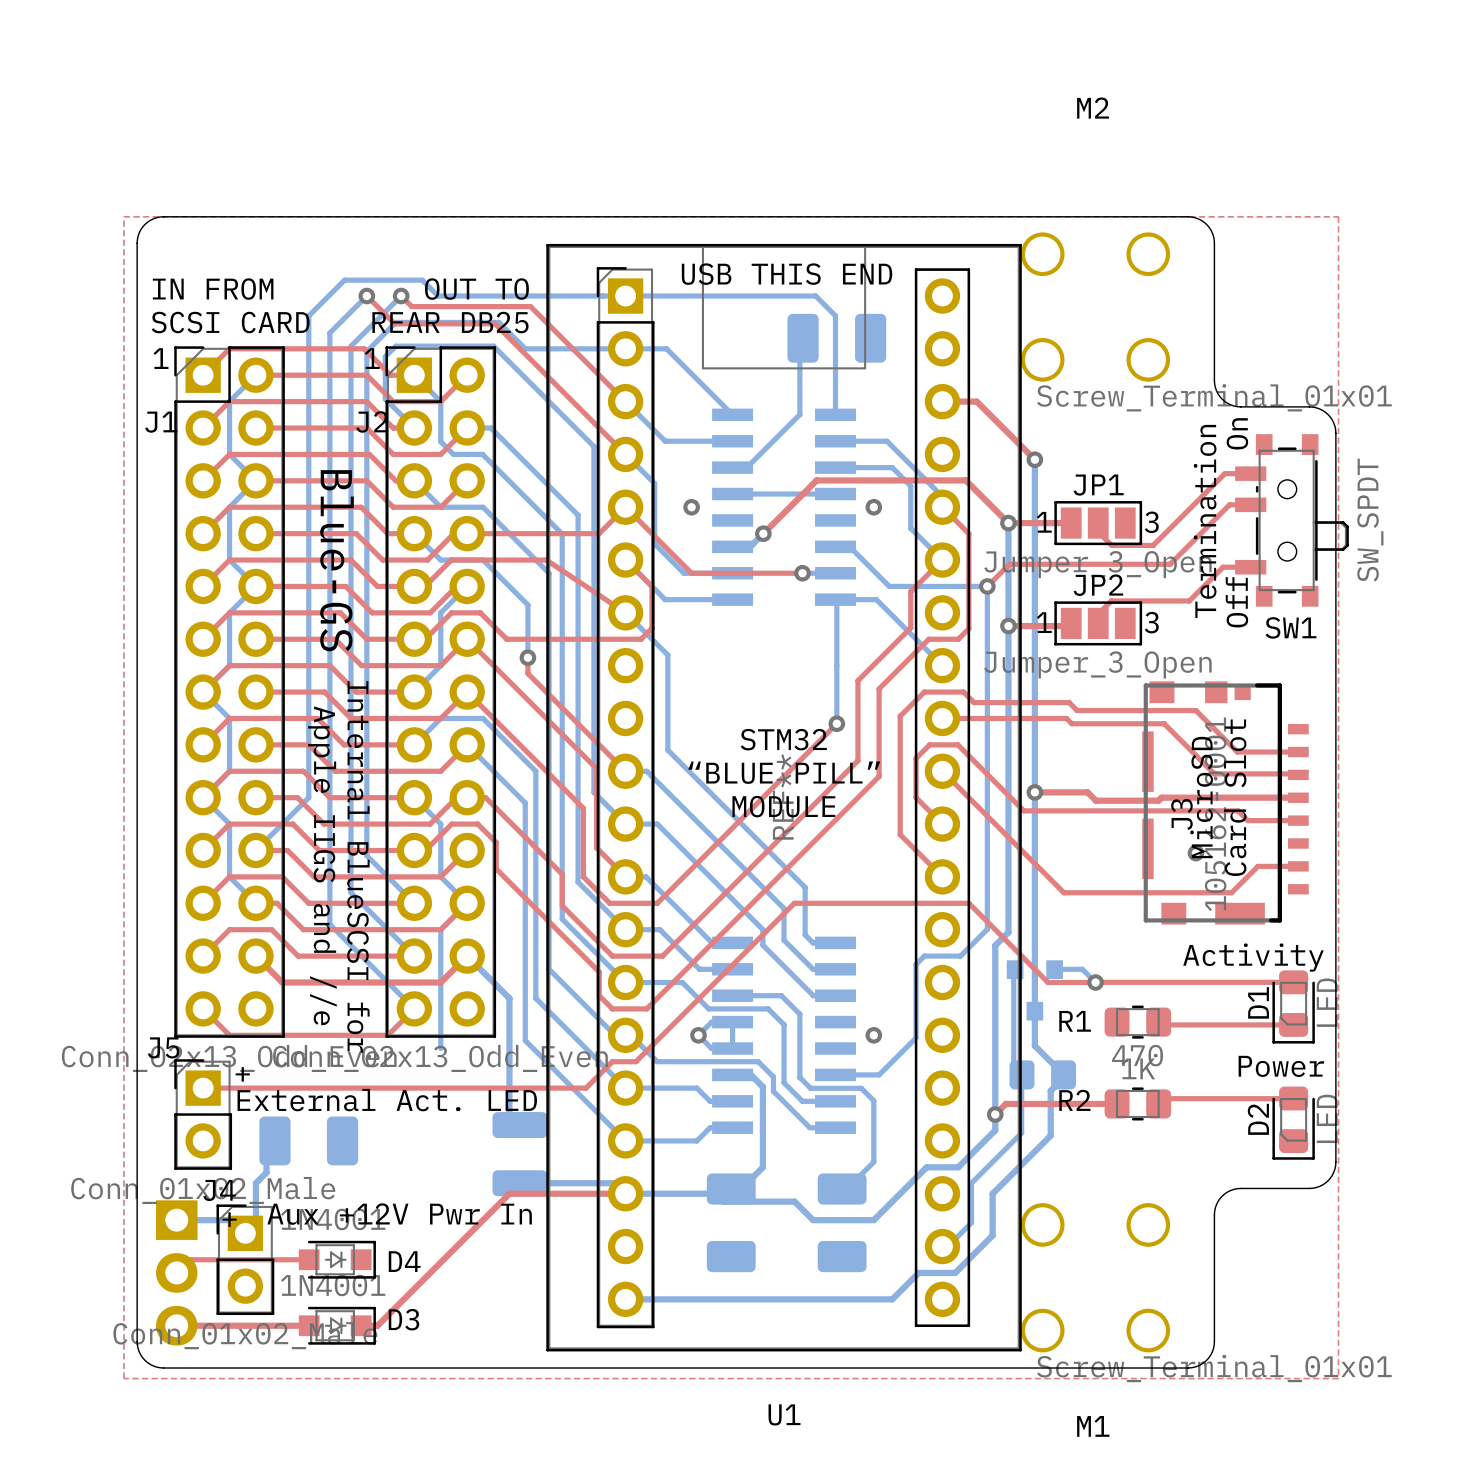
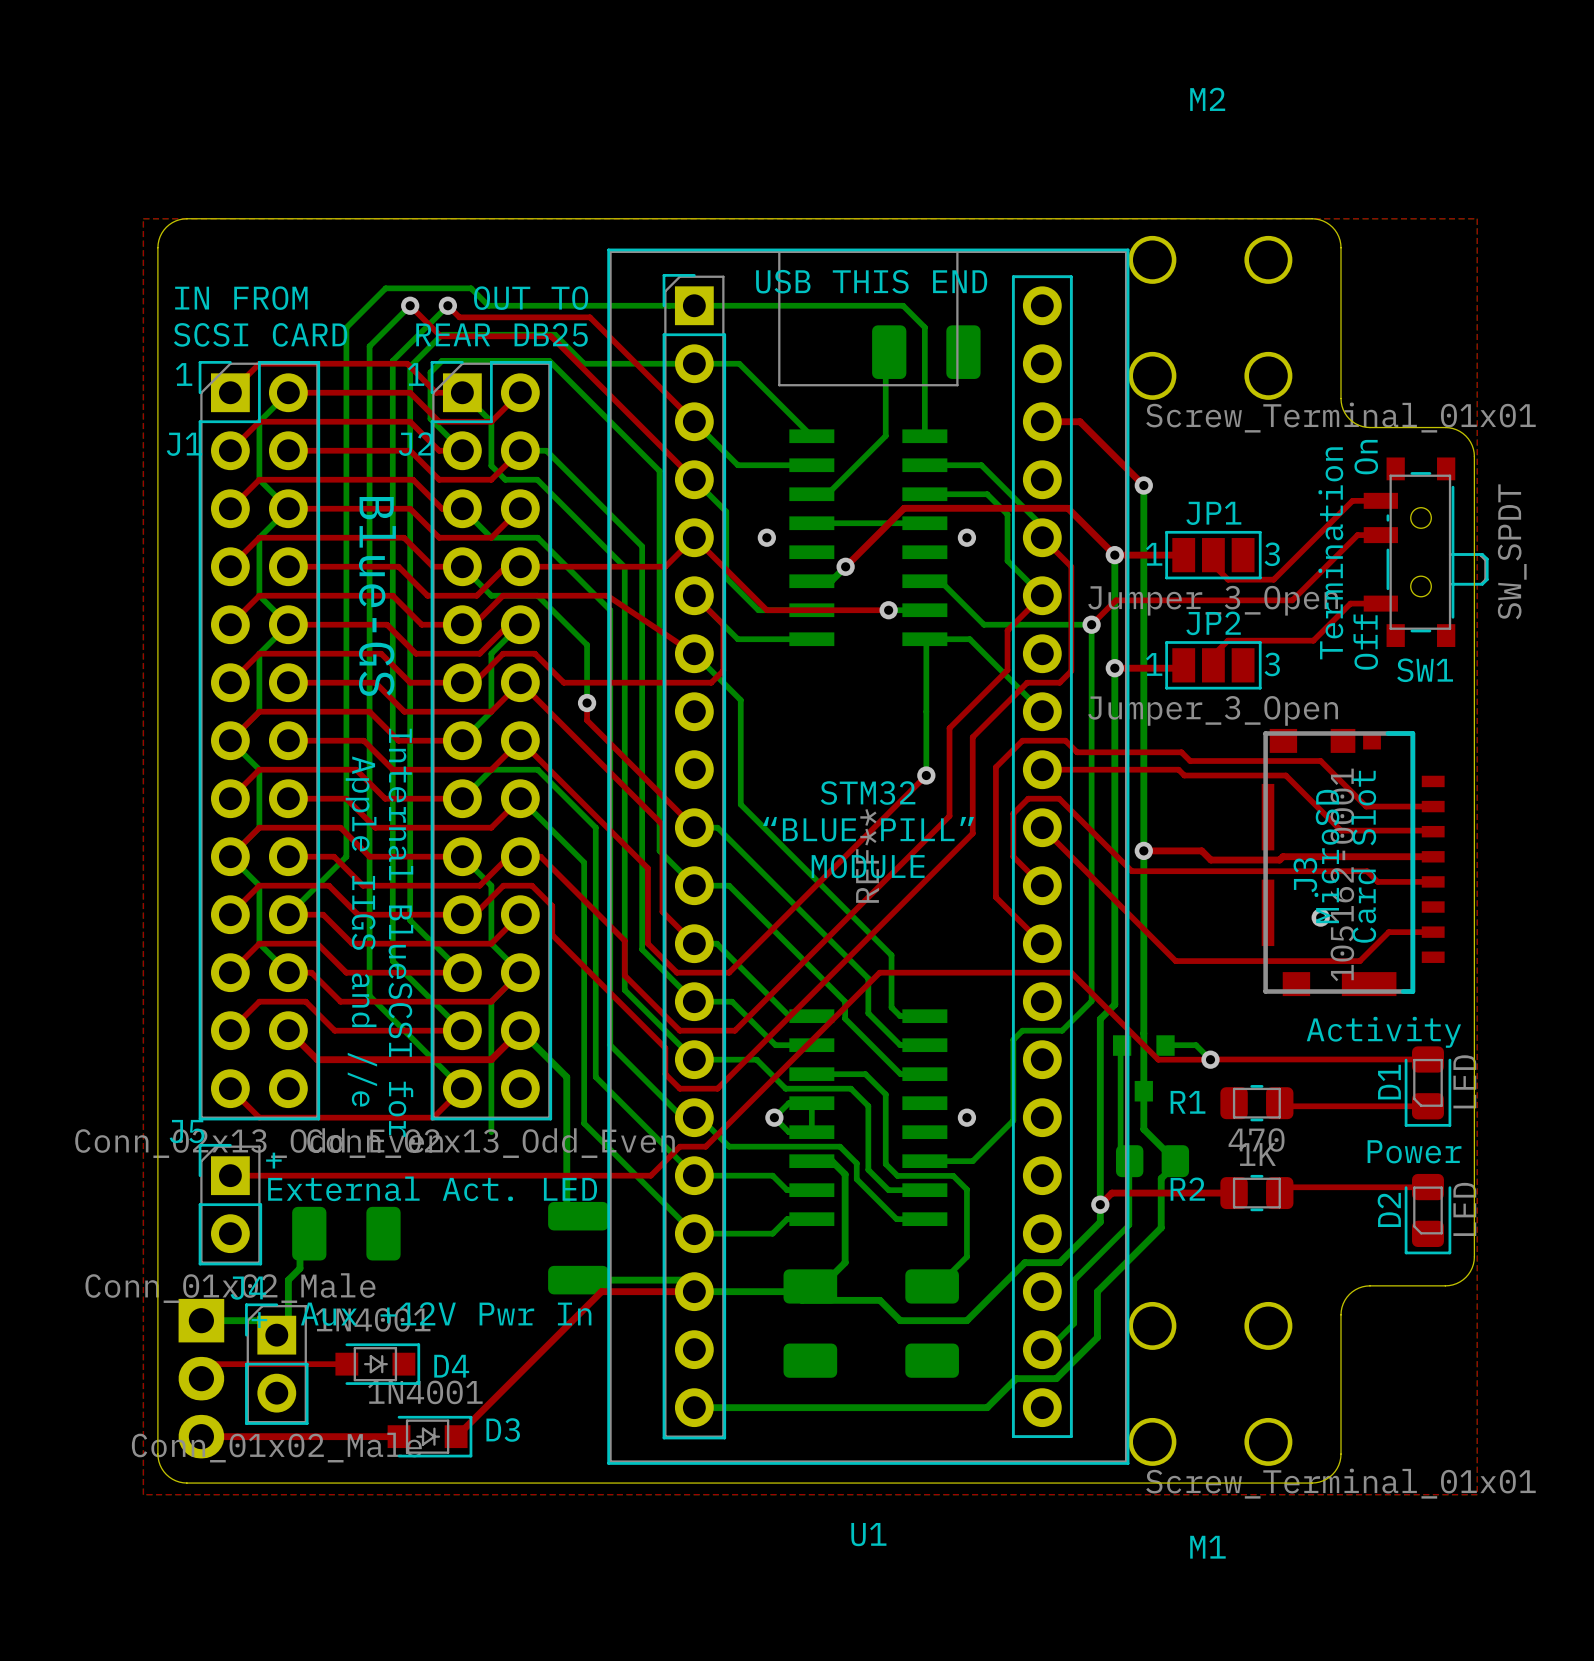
top track: (541, 1193) (509, 1193) (377, 1325) (361, 1325) -> (601, 1291) (456, 1436)
top track: none -> (346, 1436) (399, 1436)
D3 position: (337, 1325) -> (429, 1436)

